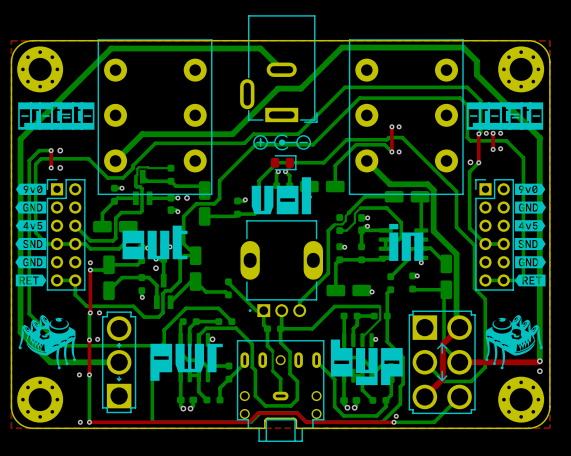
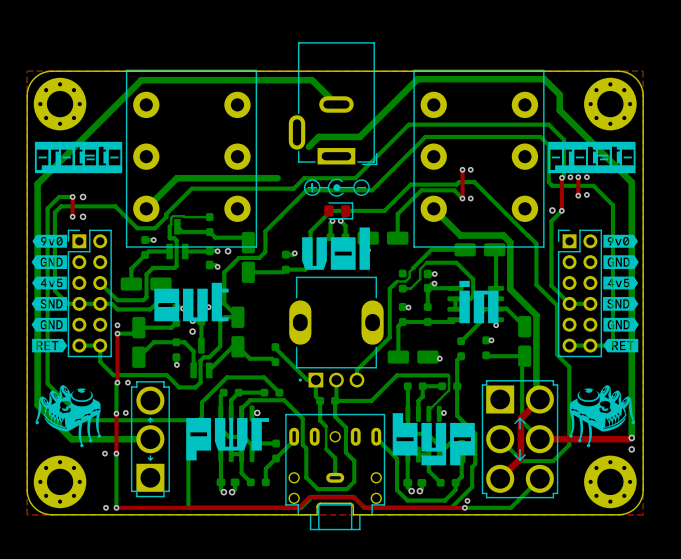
bottom track: (352, 47) (342, 47) (300, 88) (278, 88) (232, 134) (230, 134) -> (417, 79) (359, 136) (318, 136) (308, 146)

